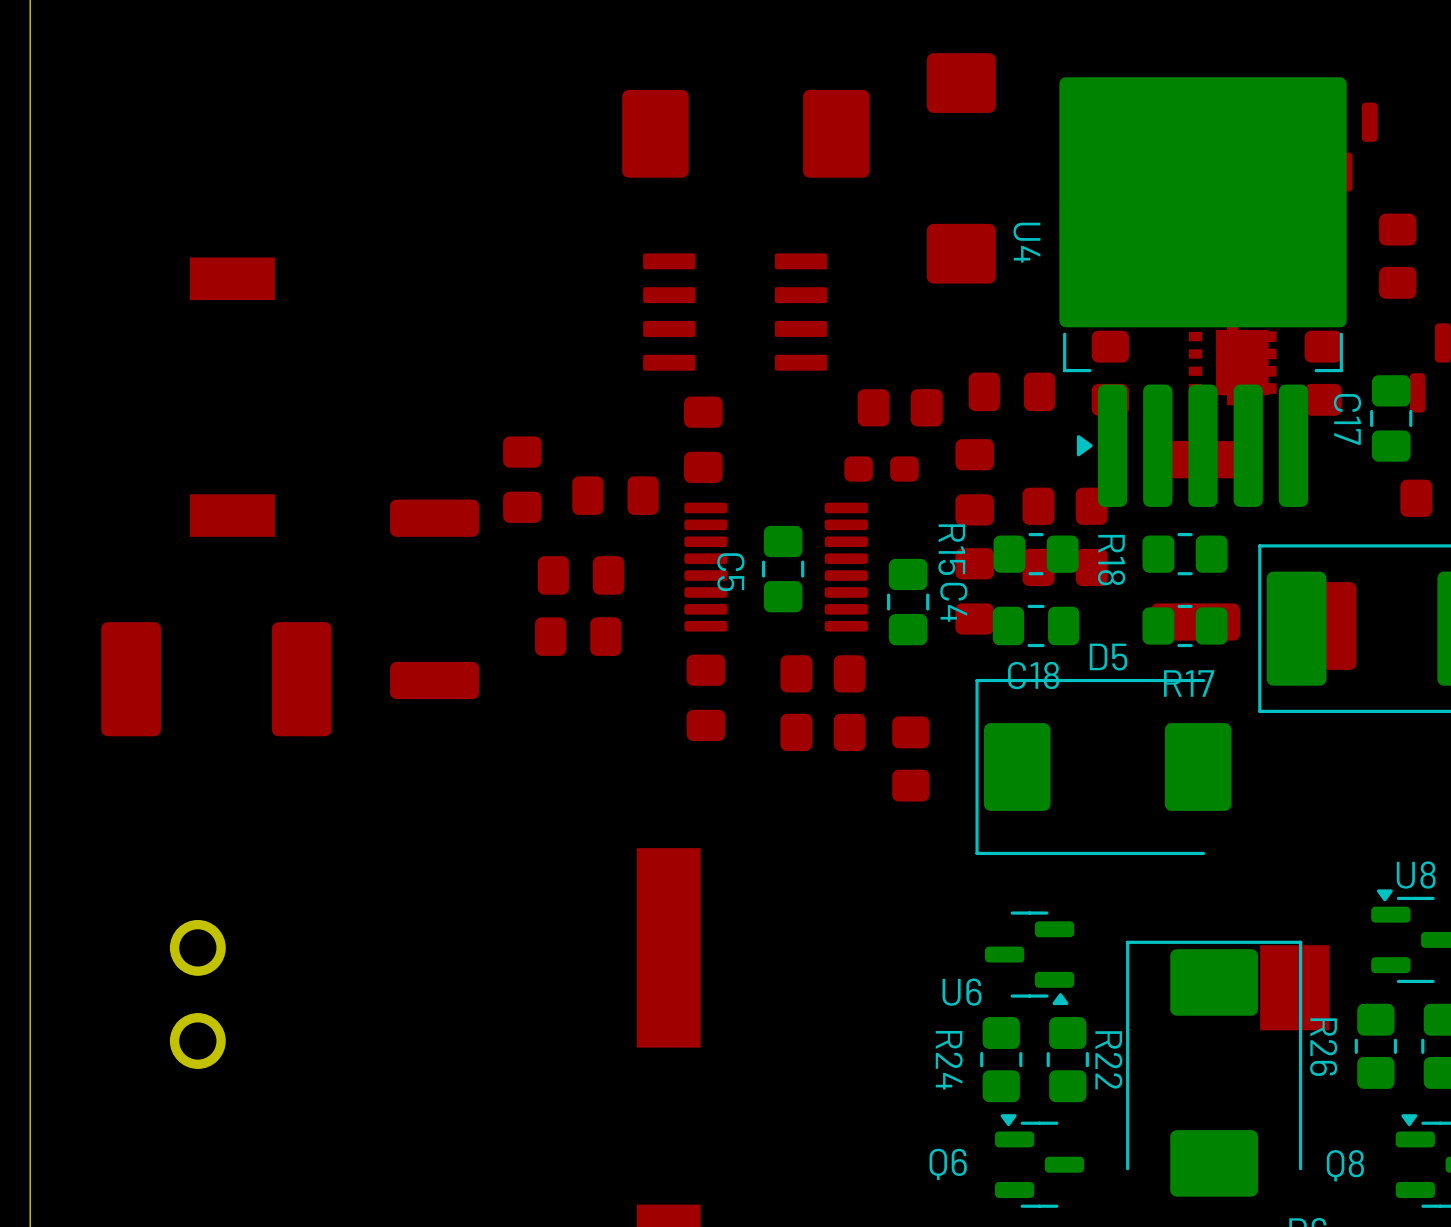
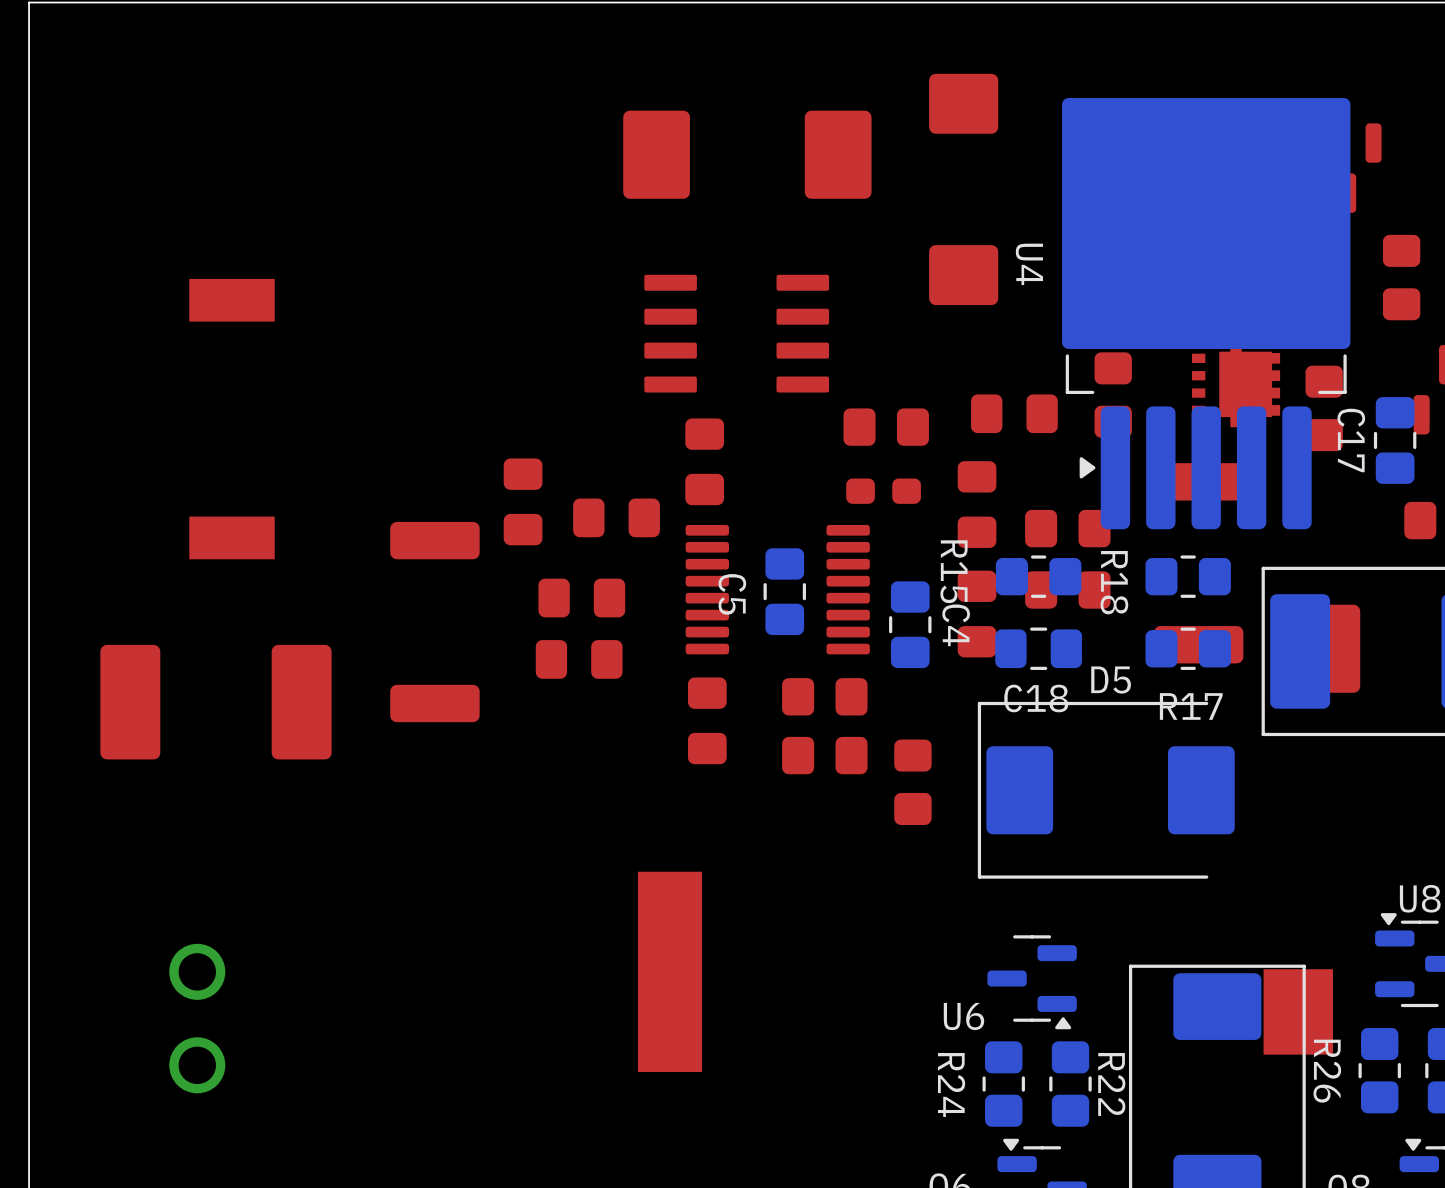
part position: (1323, 373) -> (1324, 408)
part position: (900, 407) -> (886, 427)

